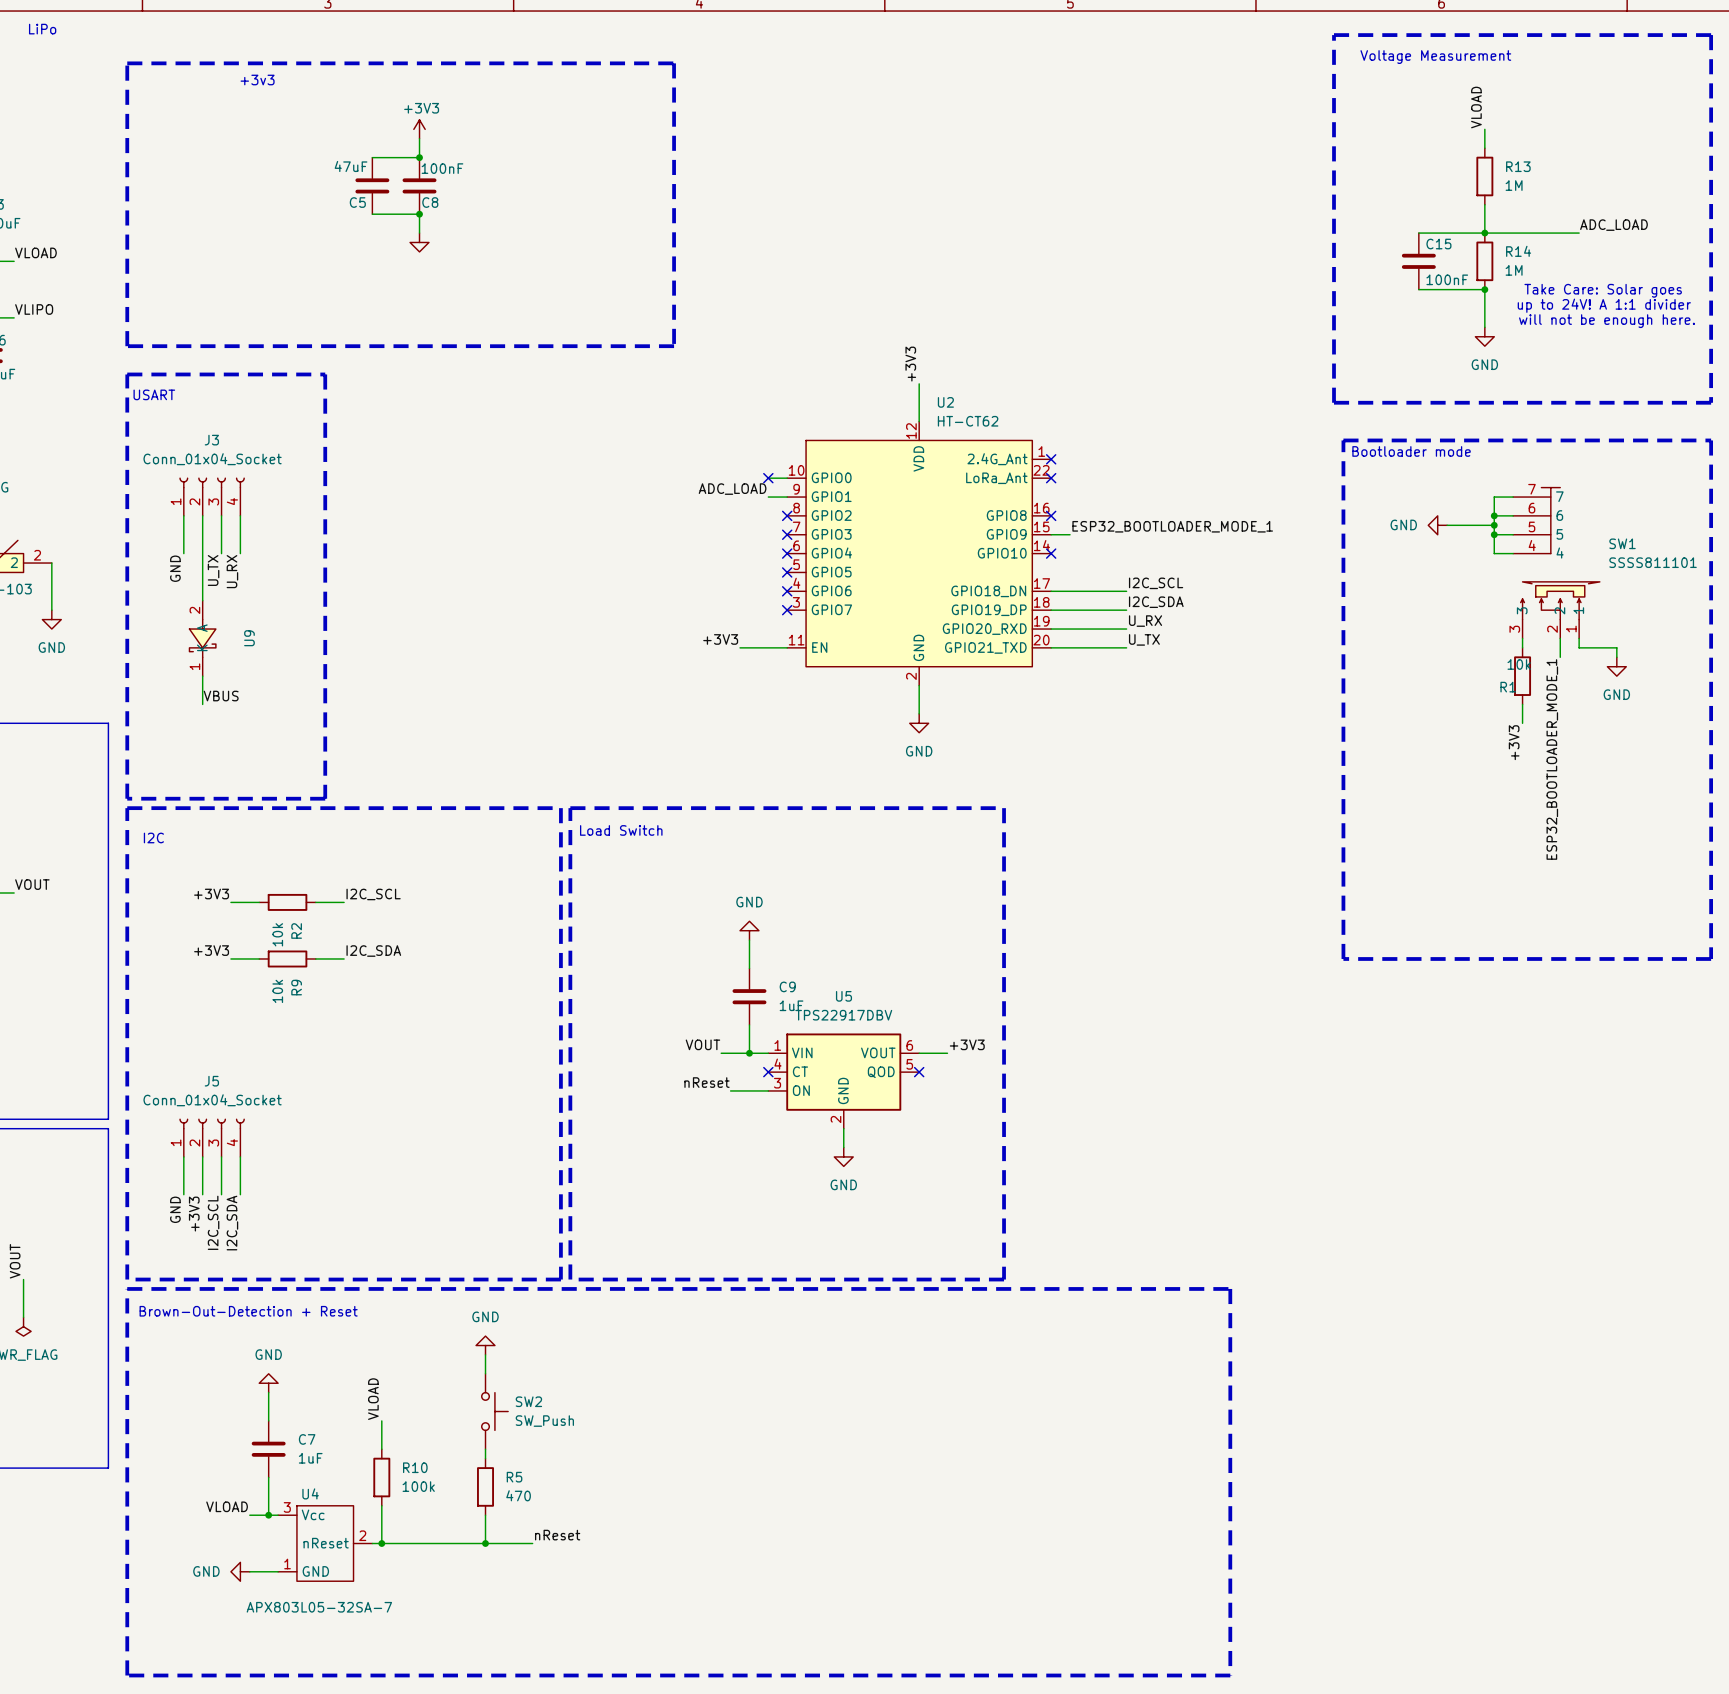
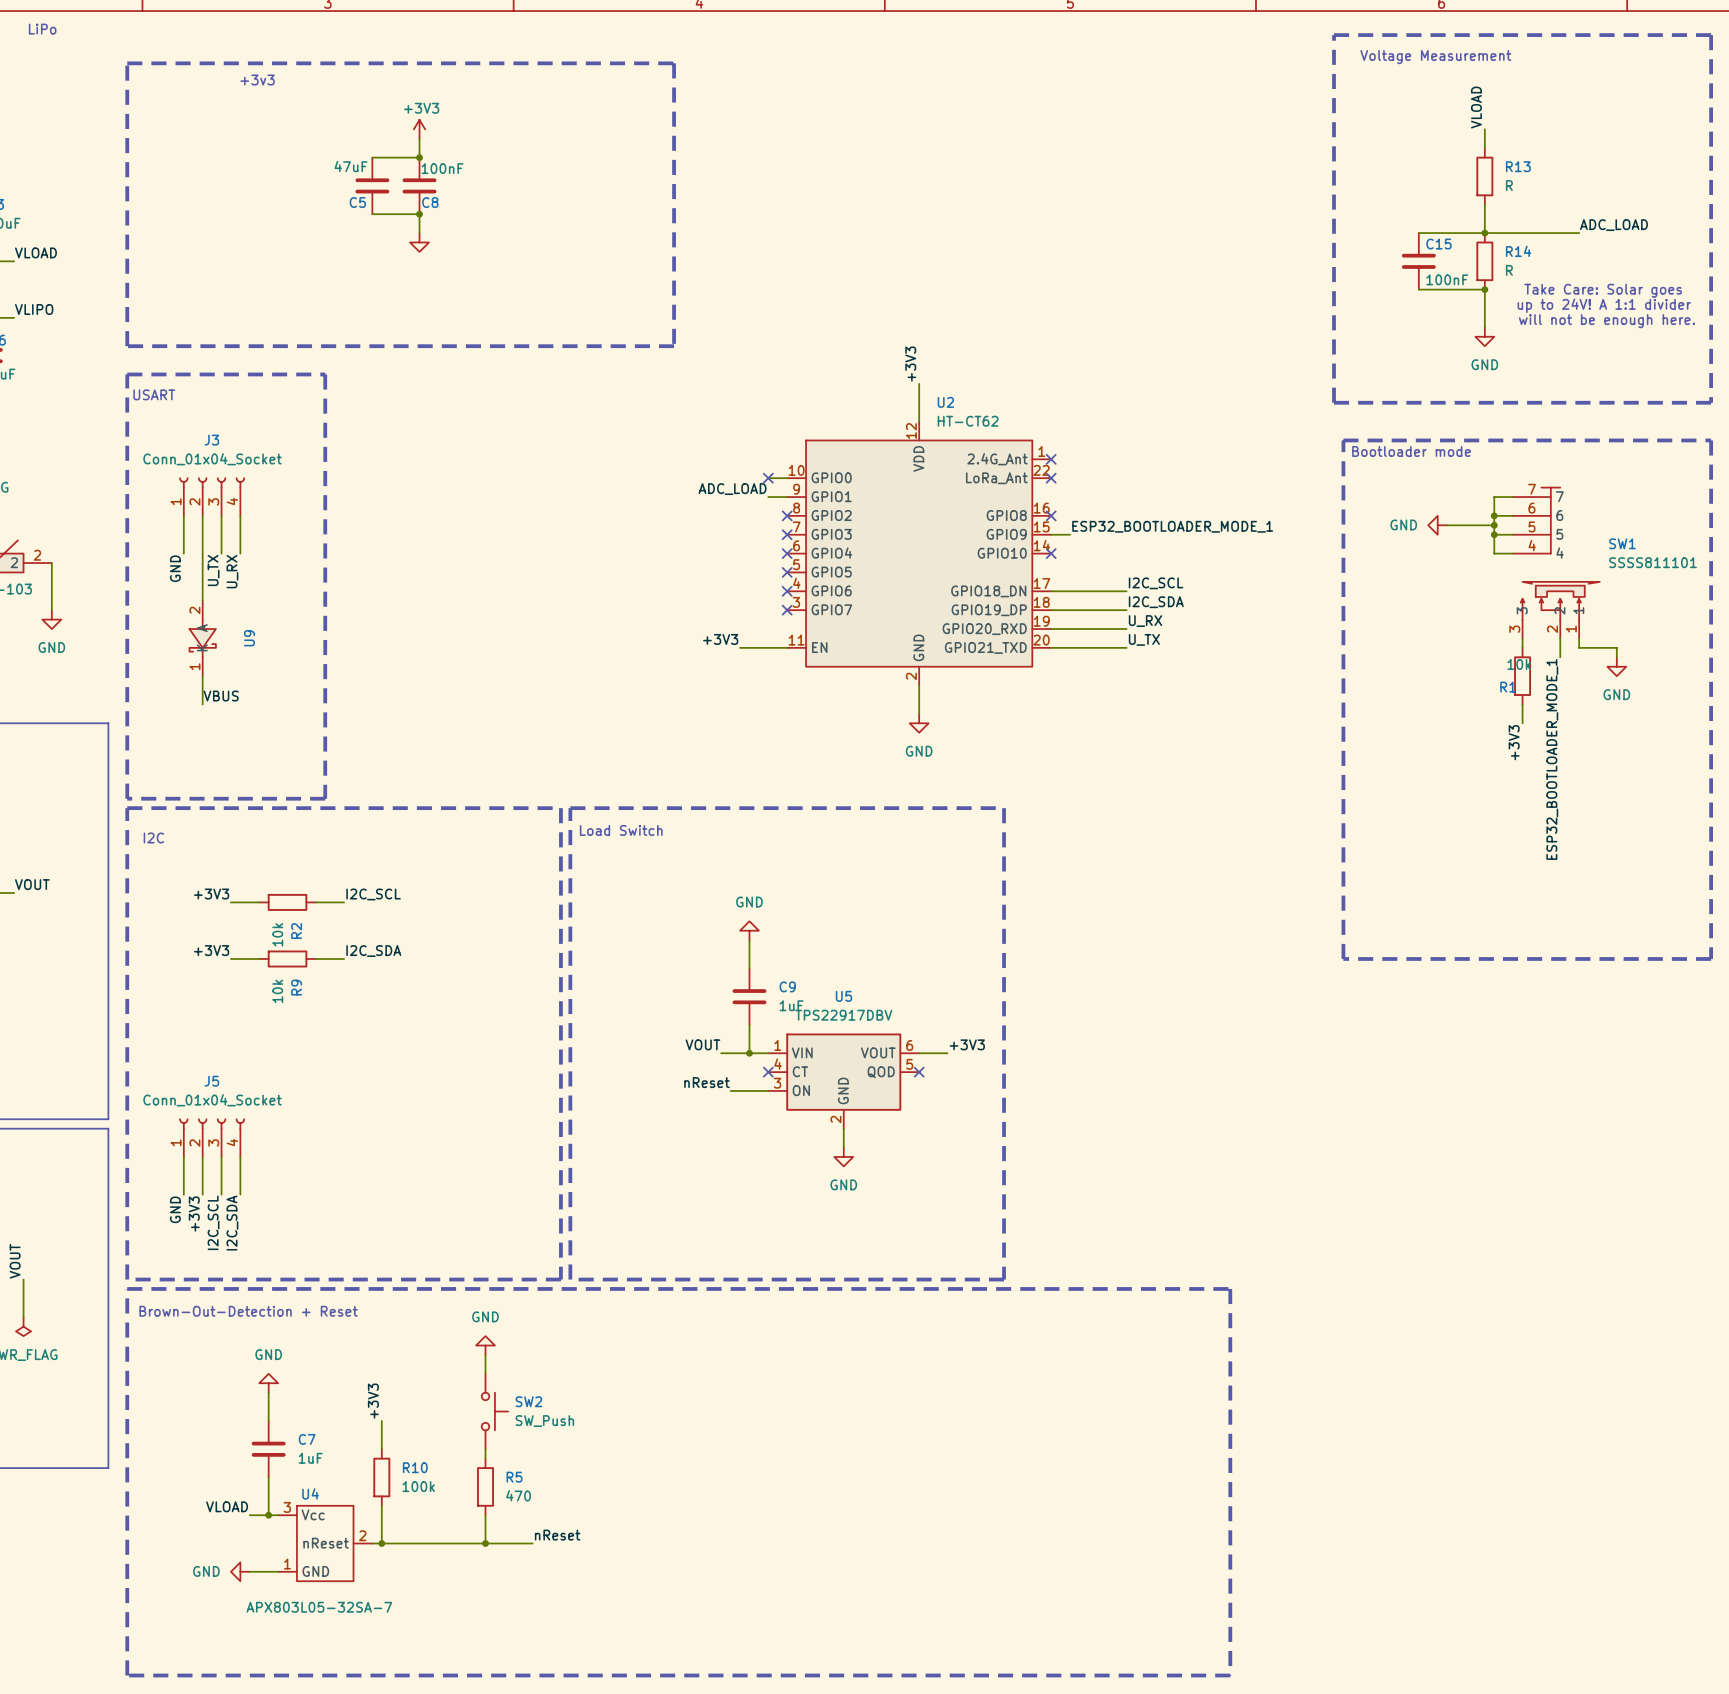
R13 value: 1M (1514, 185) -> R (1509, 185)
R14 value: 1M (1514, 270) -> R (1509, 270)
label: VLOAD (373, 1399) -> +3V3 (373, 1401)

